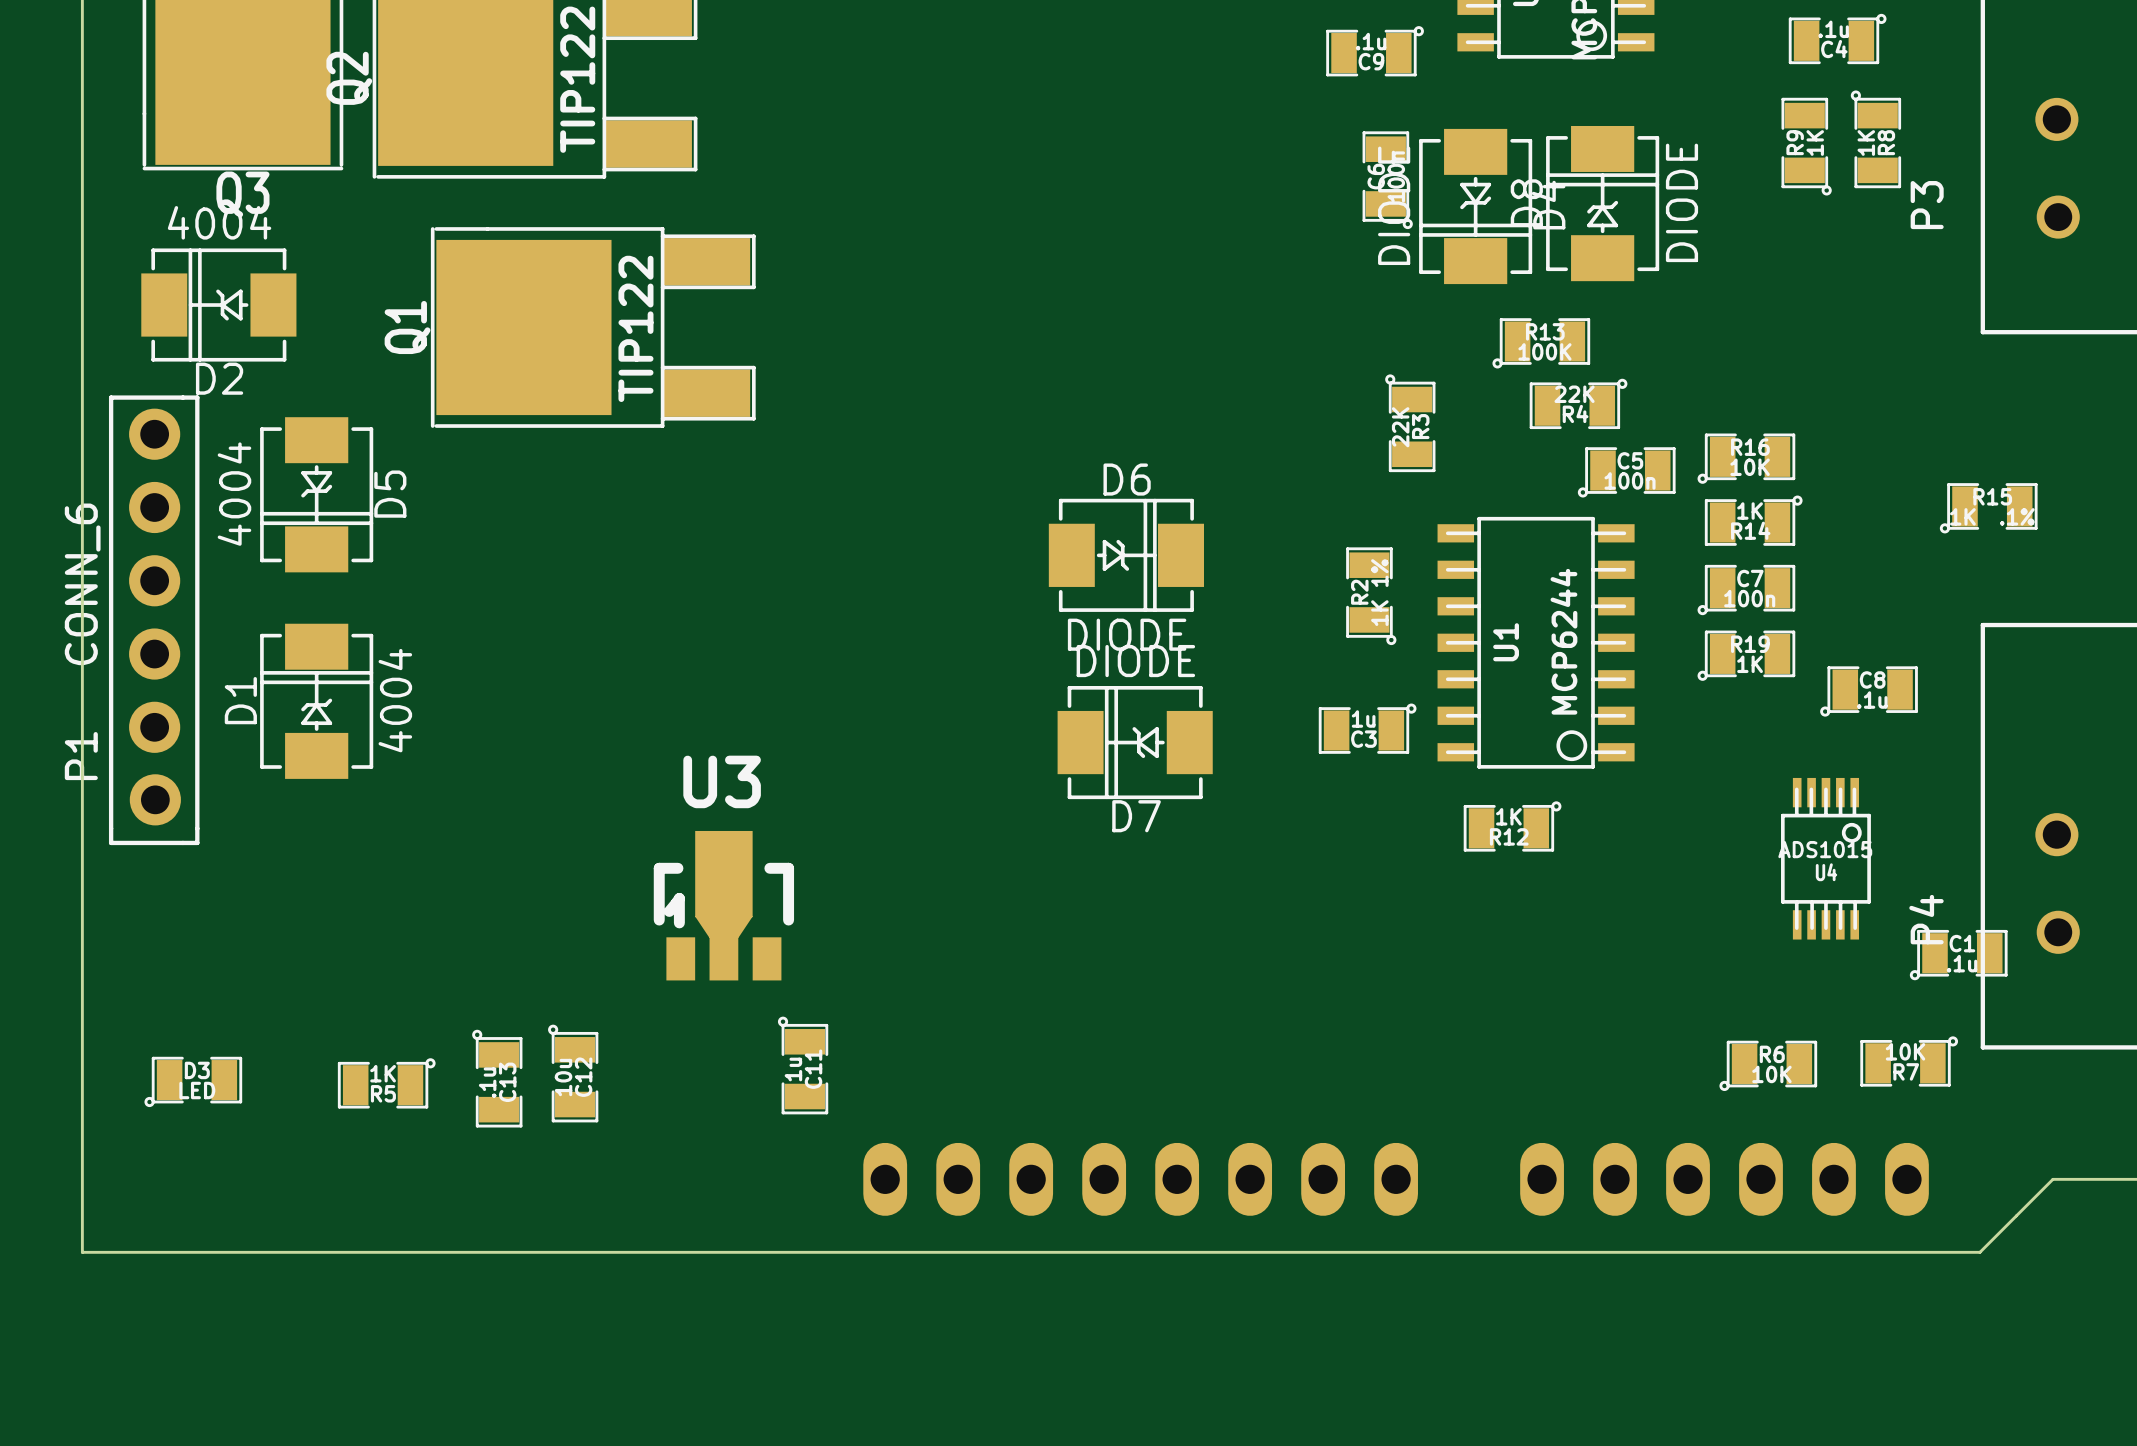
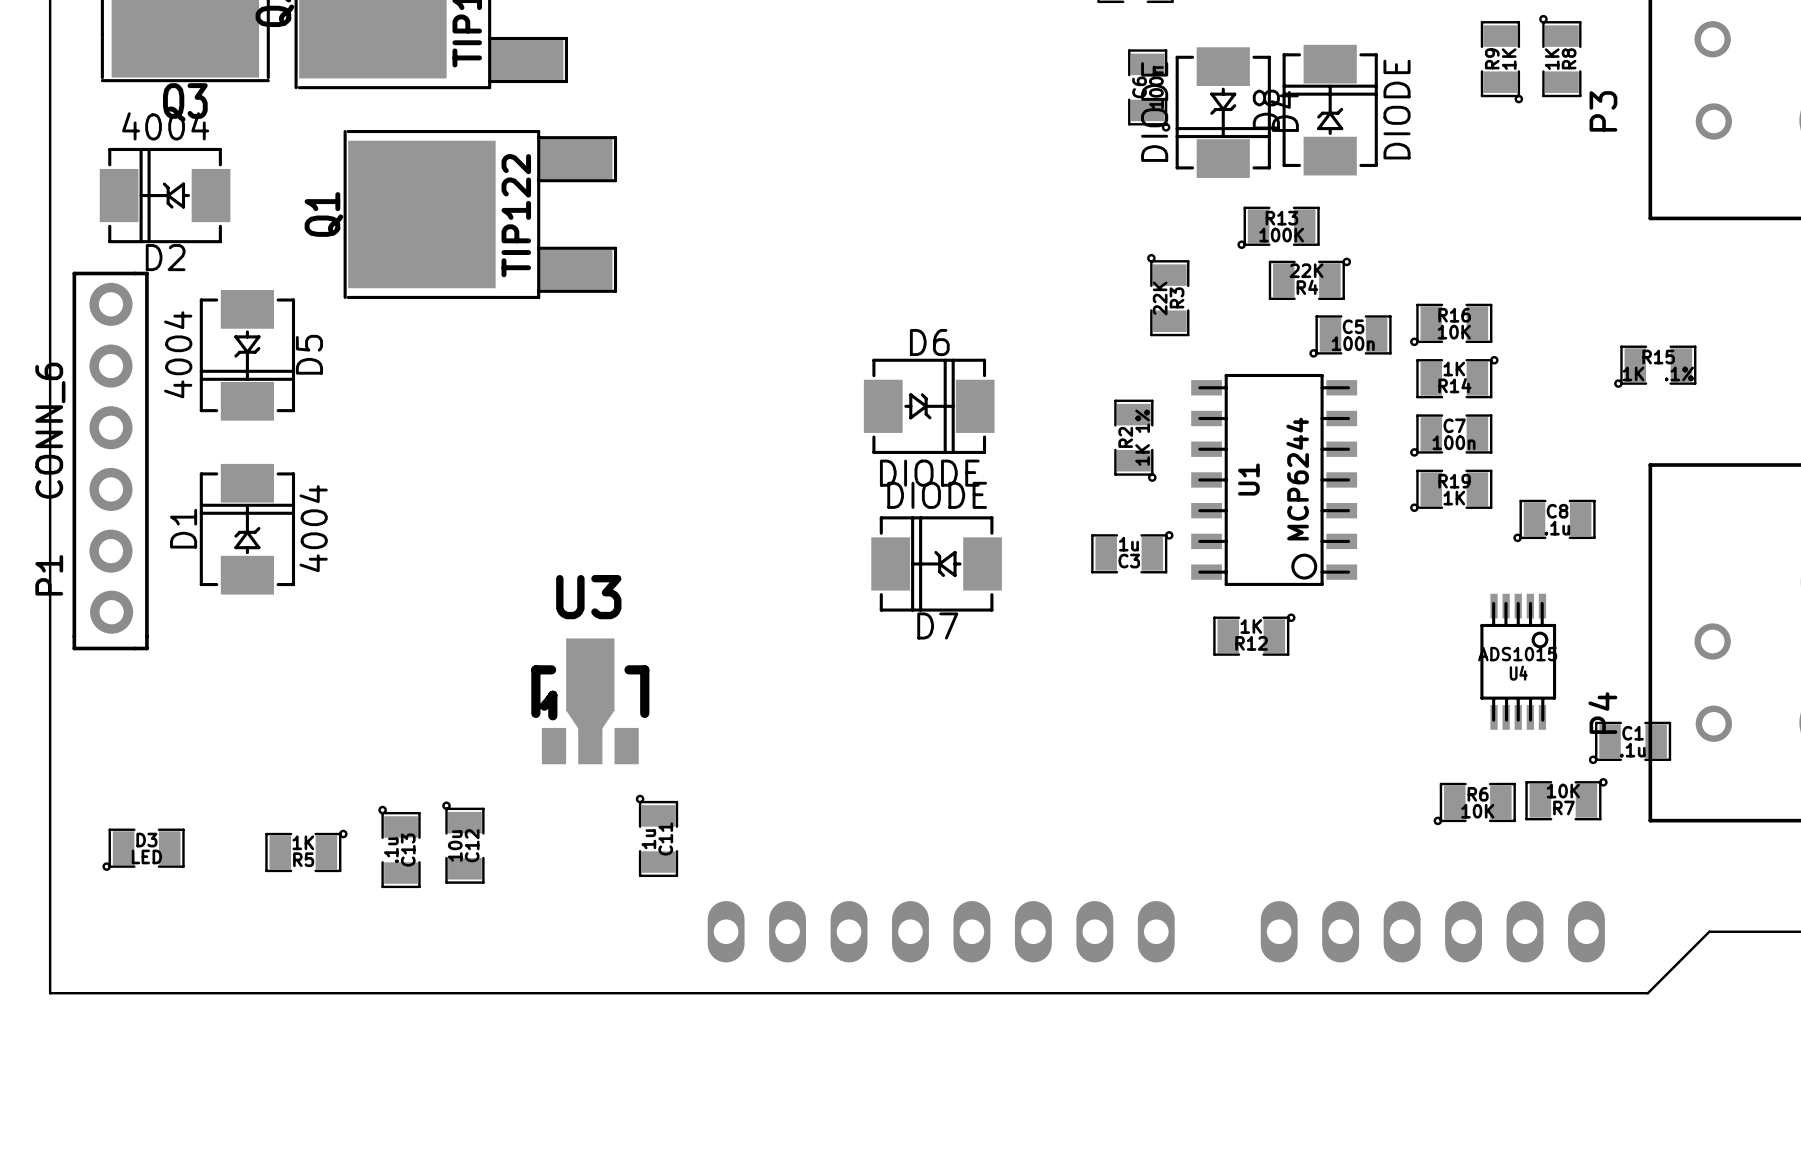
R7 position: (1909, 1061) -> (1566, 799)
R6 position: (1768, 1065) -> (1474, 803)

